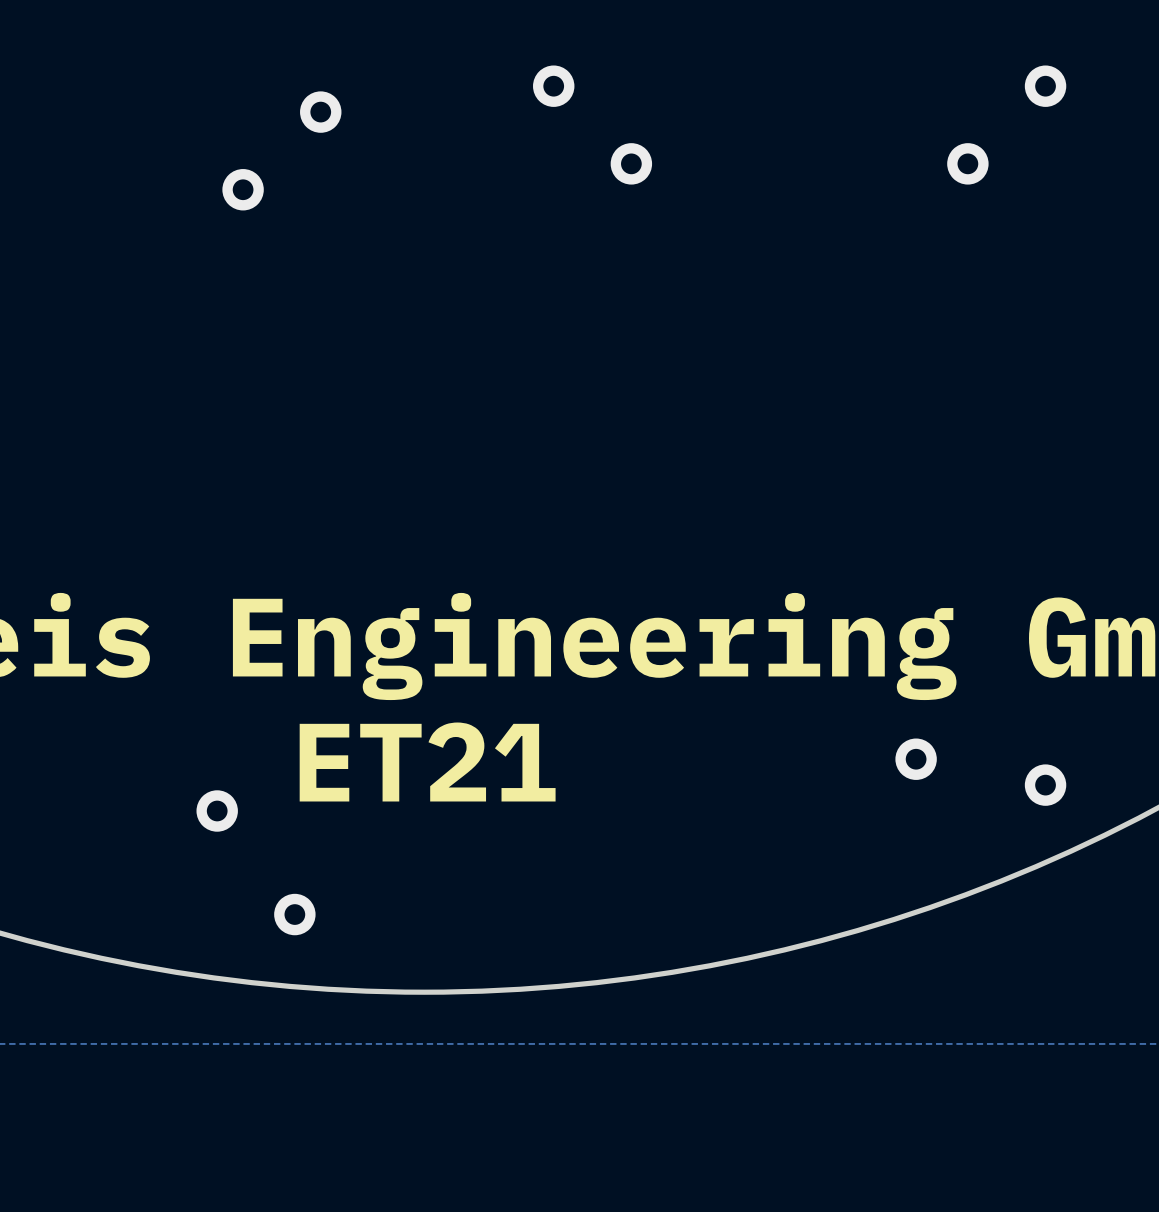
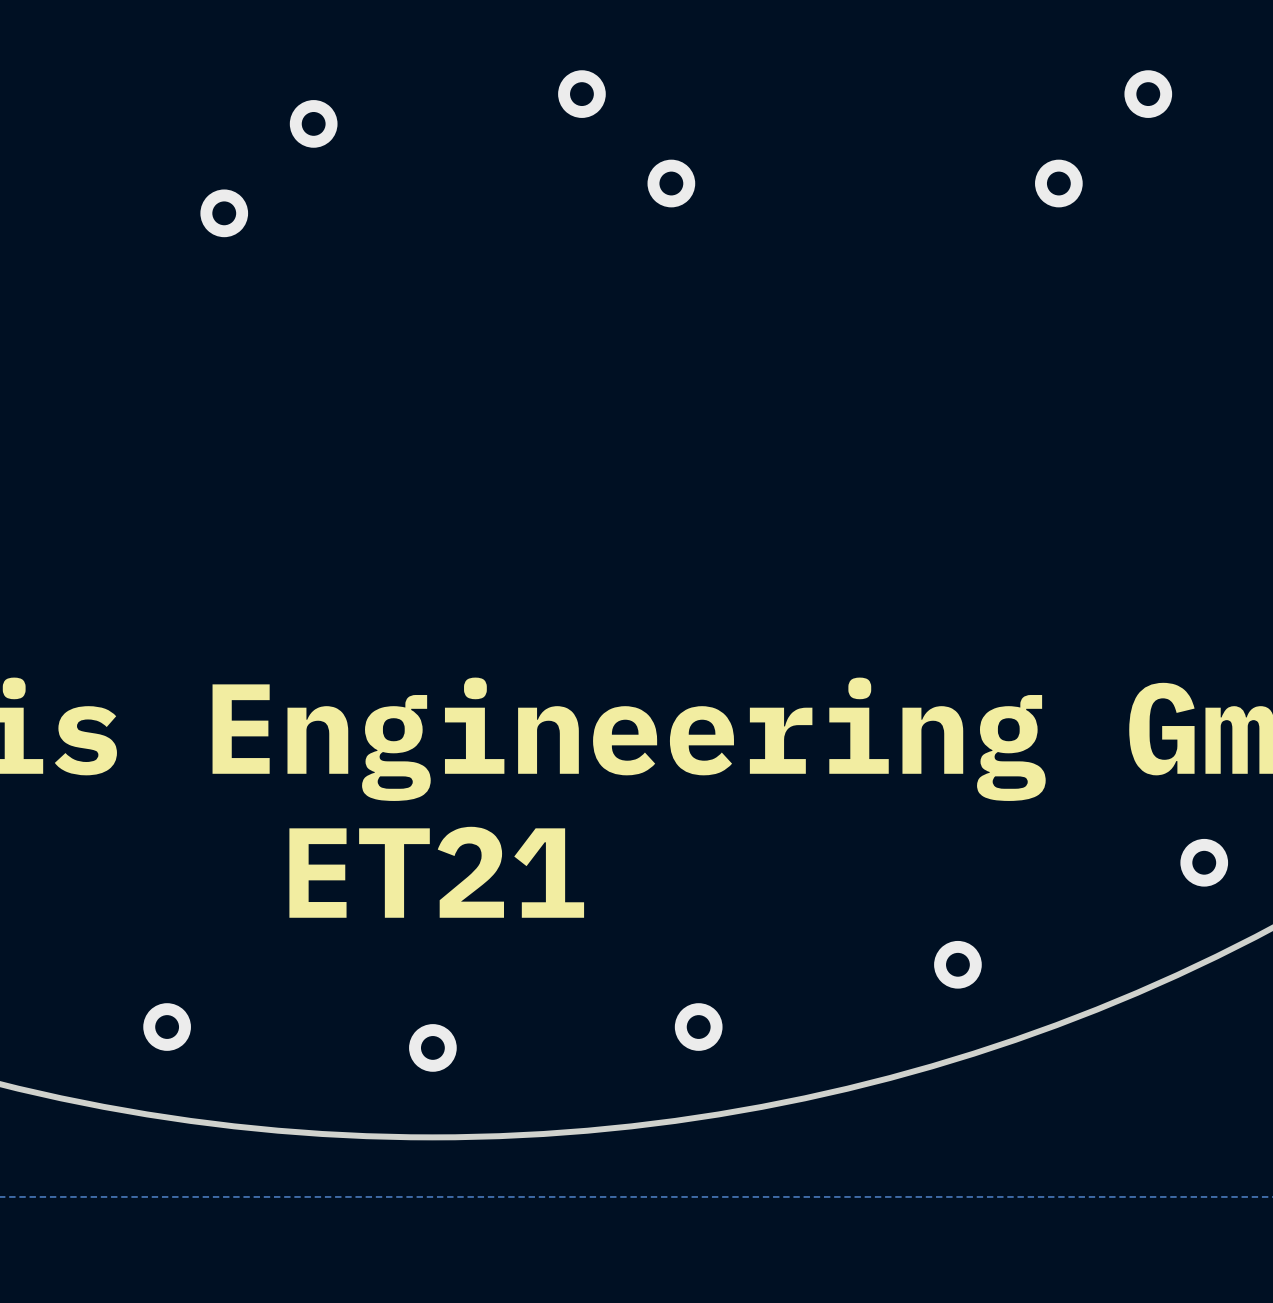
via: (916, 759) -> none
via position: (1045, 785) -> (1204, 862)
via: (217, 811) -> none
via: none -> (957, 964)
via: none -> (167, 1027)
via: none -> (698, 1027)
via: (294, 914) -> none
via: none -> (432, 1047)

